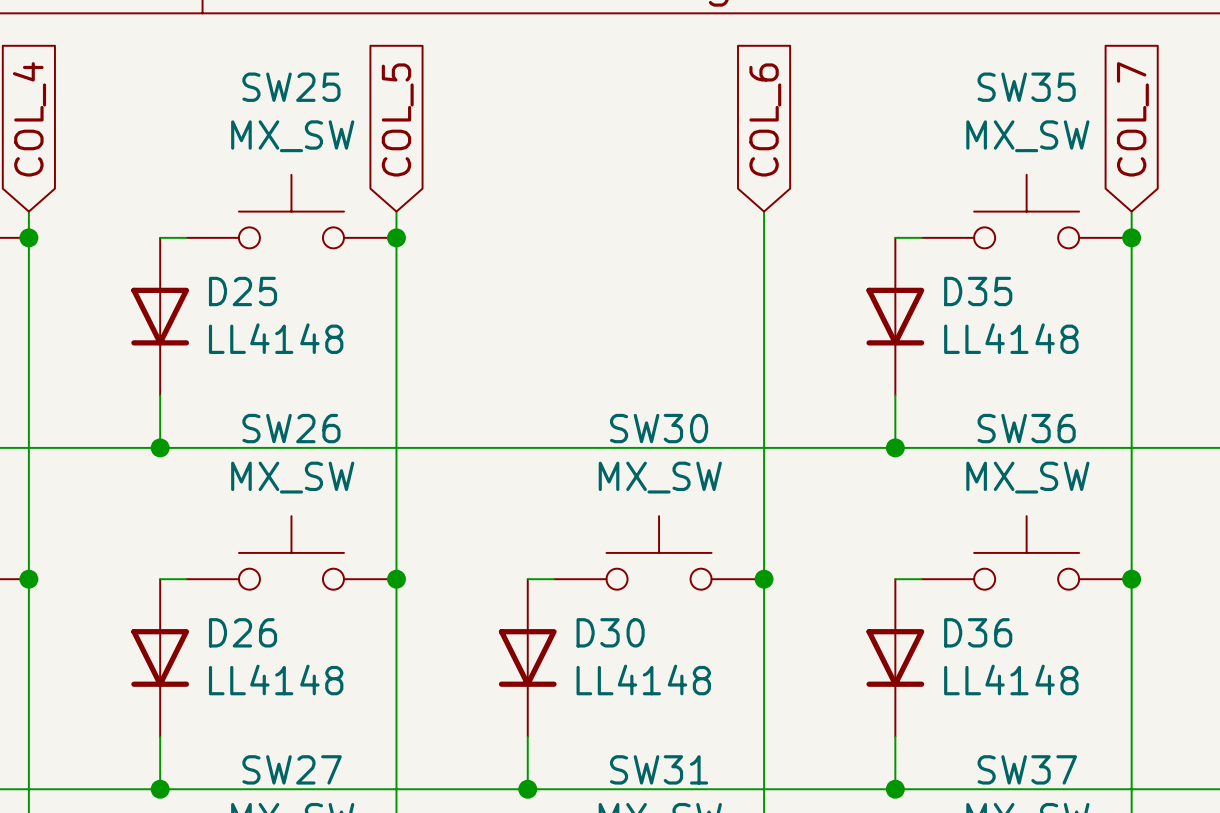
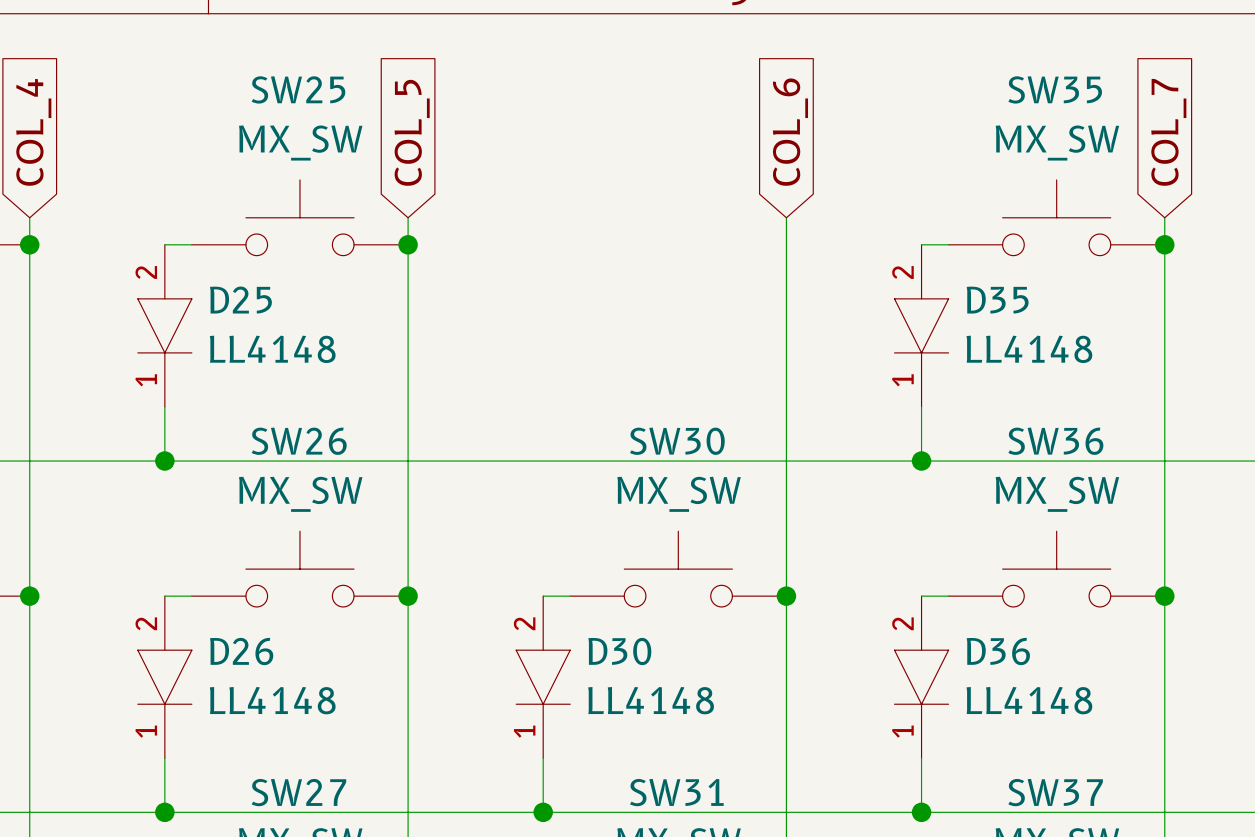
D25 symbol: [131, 237, 190, 396] -> [137, 244, 192, 407]
D35 symbol: [866, 237, 925, 396] -> [894, 244, 949, 407]
D26 symbol: [131, 579, 190, 737] -> [137, 596, 192, 759]
D30 symbol: [498, 579, 557, 737] -> [516, 596, 571, 759]
D36 symbol: [866, 579, 925, 737] -> [894, 596, 949, 759]

